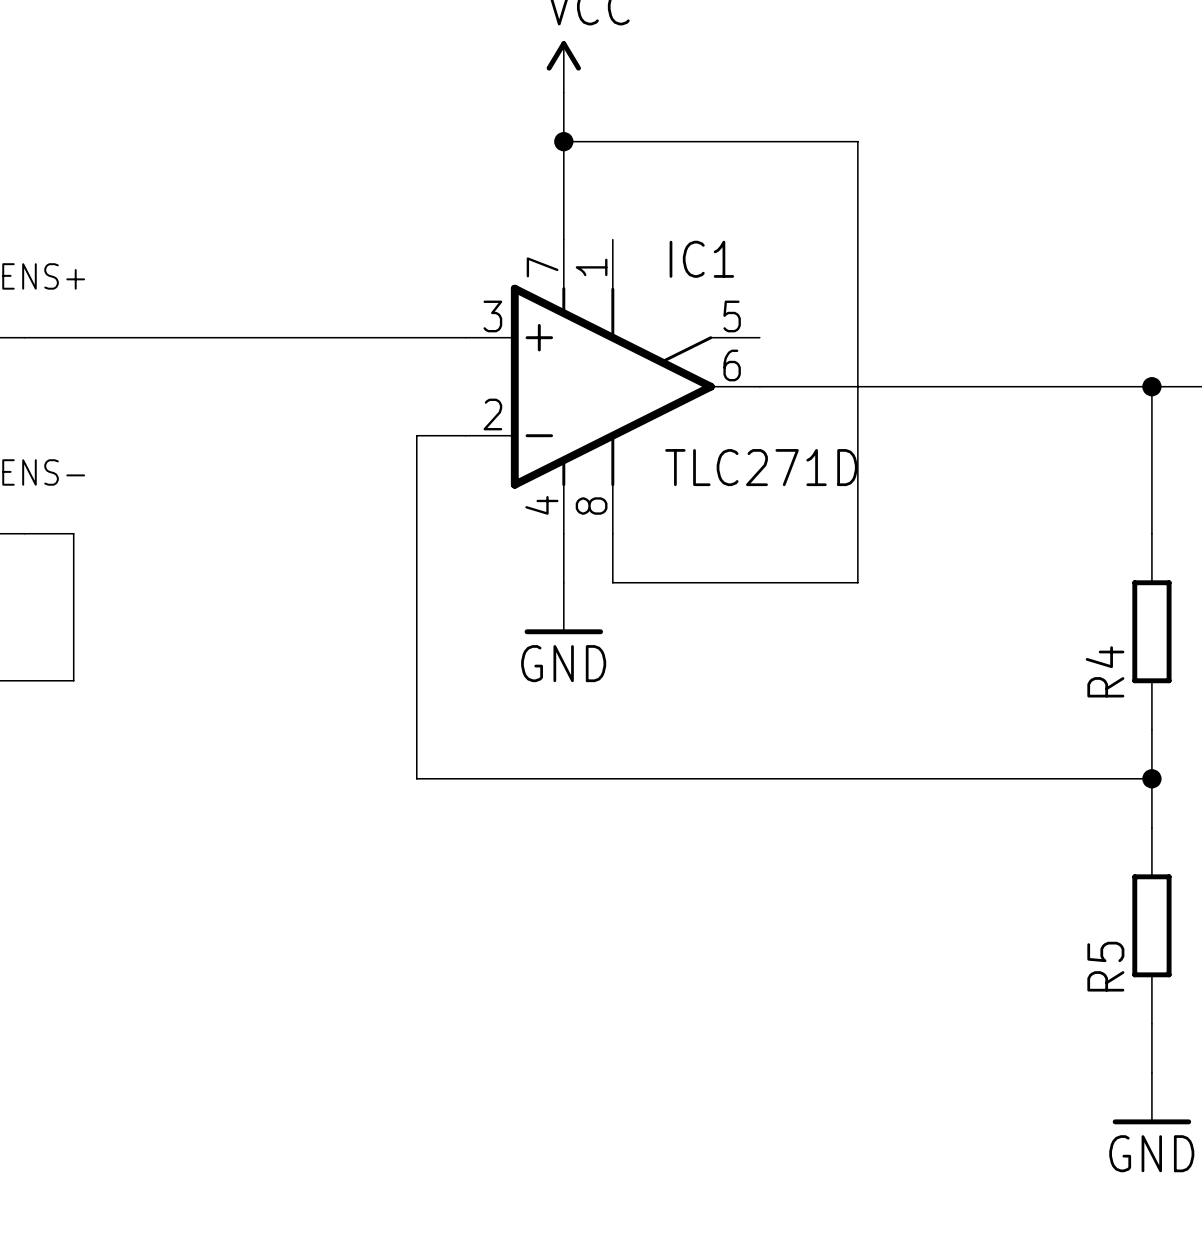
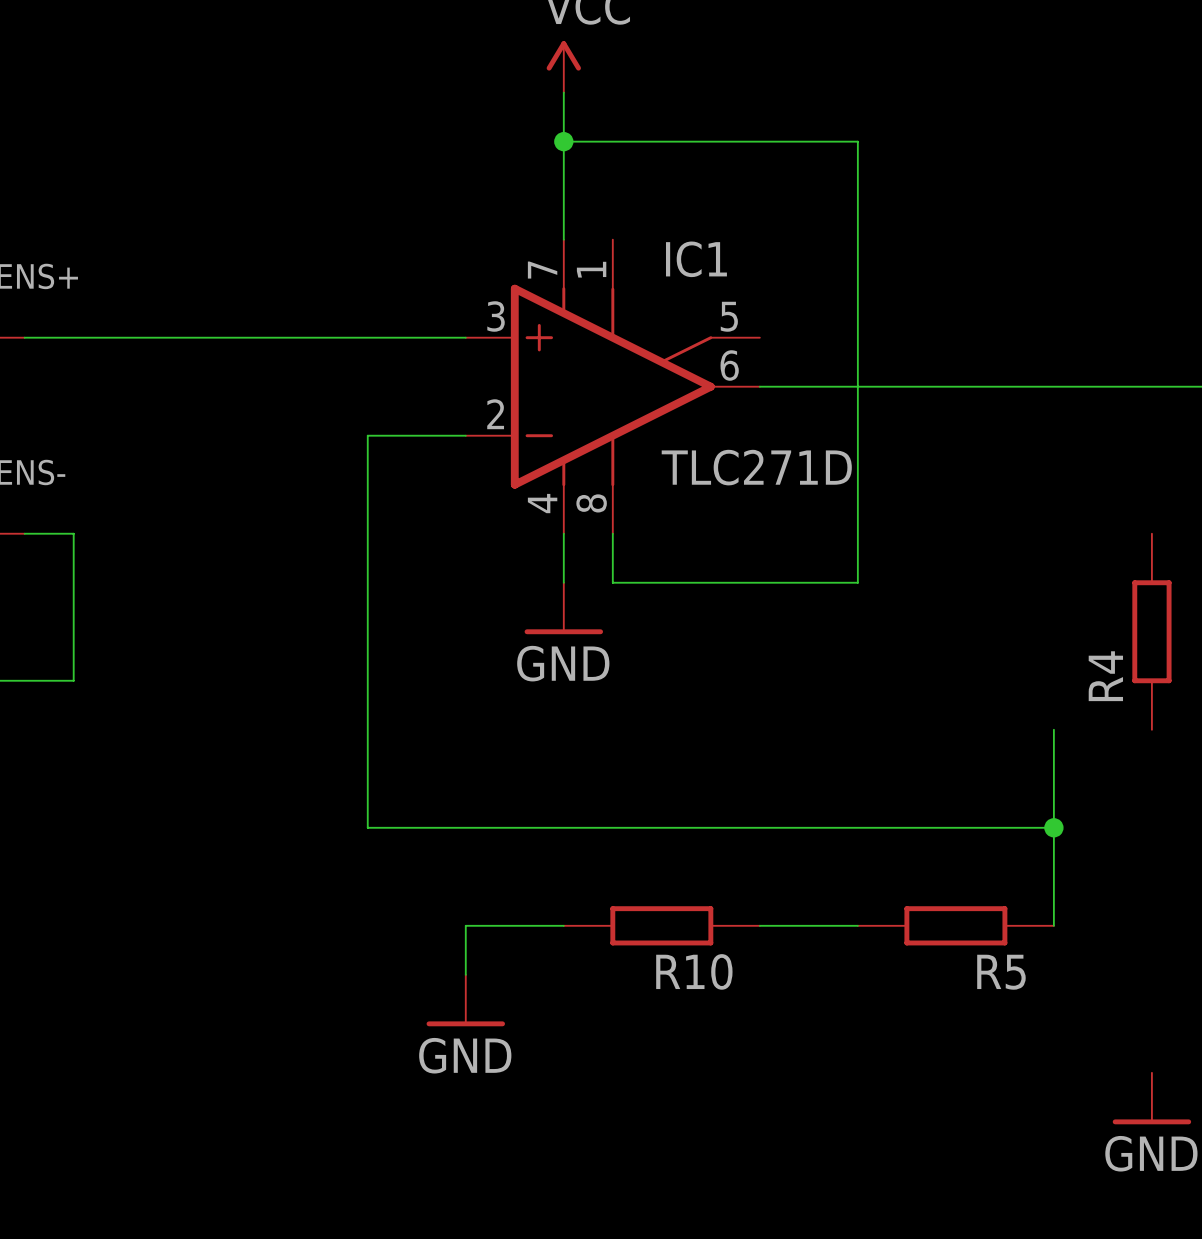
wire: (1151, 386) (1151, 533) -> none
junction: (1151, 386) -> none
wire: (416, 435) (416, 778) (1151, 778) -> (416, 435) (367, 435) (367, 827) (1053, 827)
wire: none -> (1053, 729) (1053, 925)
wire: (1151, 729) (1151, 827) -> none
junction position: (1151, 778) -> (1053, 827)
wire: none -> (563, 925) (465, 925) (465, 974)
R10: none -> (661, 925)
wire: none -> (759, 925) (857, 925)
R5 rotation: 0° (1151, 925) -> 90° clockwise (955, 925)
R5 position: (1151, 925) -> (955, 925)
R5 name position: R5 (1105, 966) -> R5 (1001, 972)
power symbol: none -> GND (465, 1000)
wire: (1151, 1023) (1151, 1072) -> none

